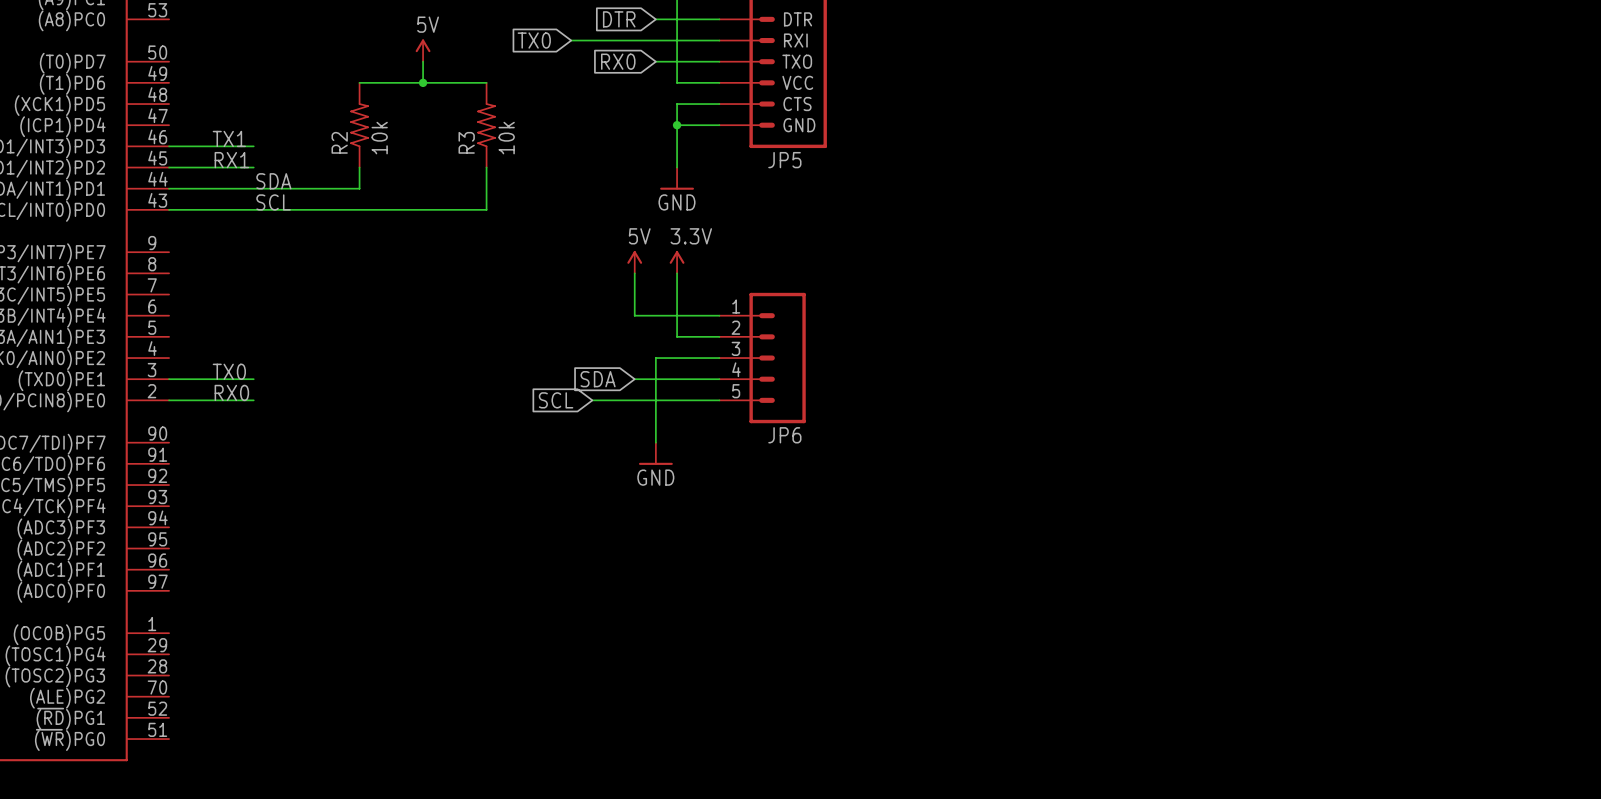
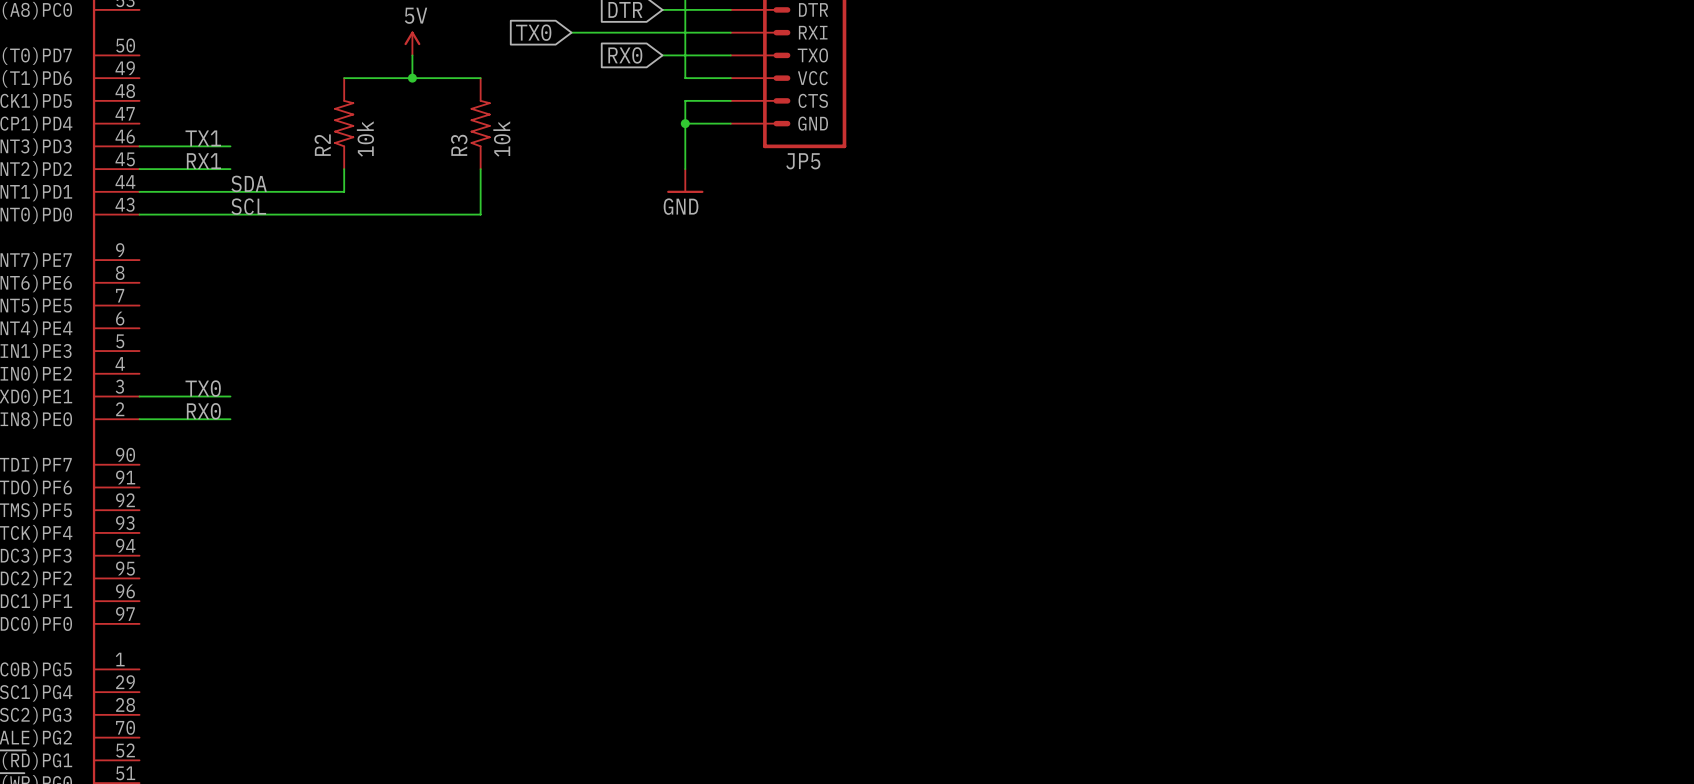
power symbol: 5V (634, 262) -> none
power symbol: 3.3V (677, 262) -> none
wire: (634, 273) (634, 315) (719, 315) -> none
wire: (677, 273) (677, 336) (719, 336) -> none
wire: (719, 358) (655, 358) (655, 442) -> none
JP6: (762, 358) -> none
global label: SDA (598, 379) -> none
wire: (634, 379) (719, 379) -> none
global label: SCL (556, 400) -> none
wire: (592, 400) (719, 400) -> none
power symbol: GND (655, 453) -> none

